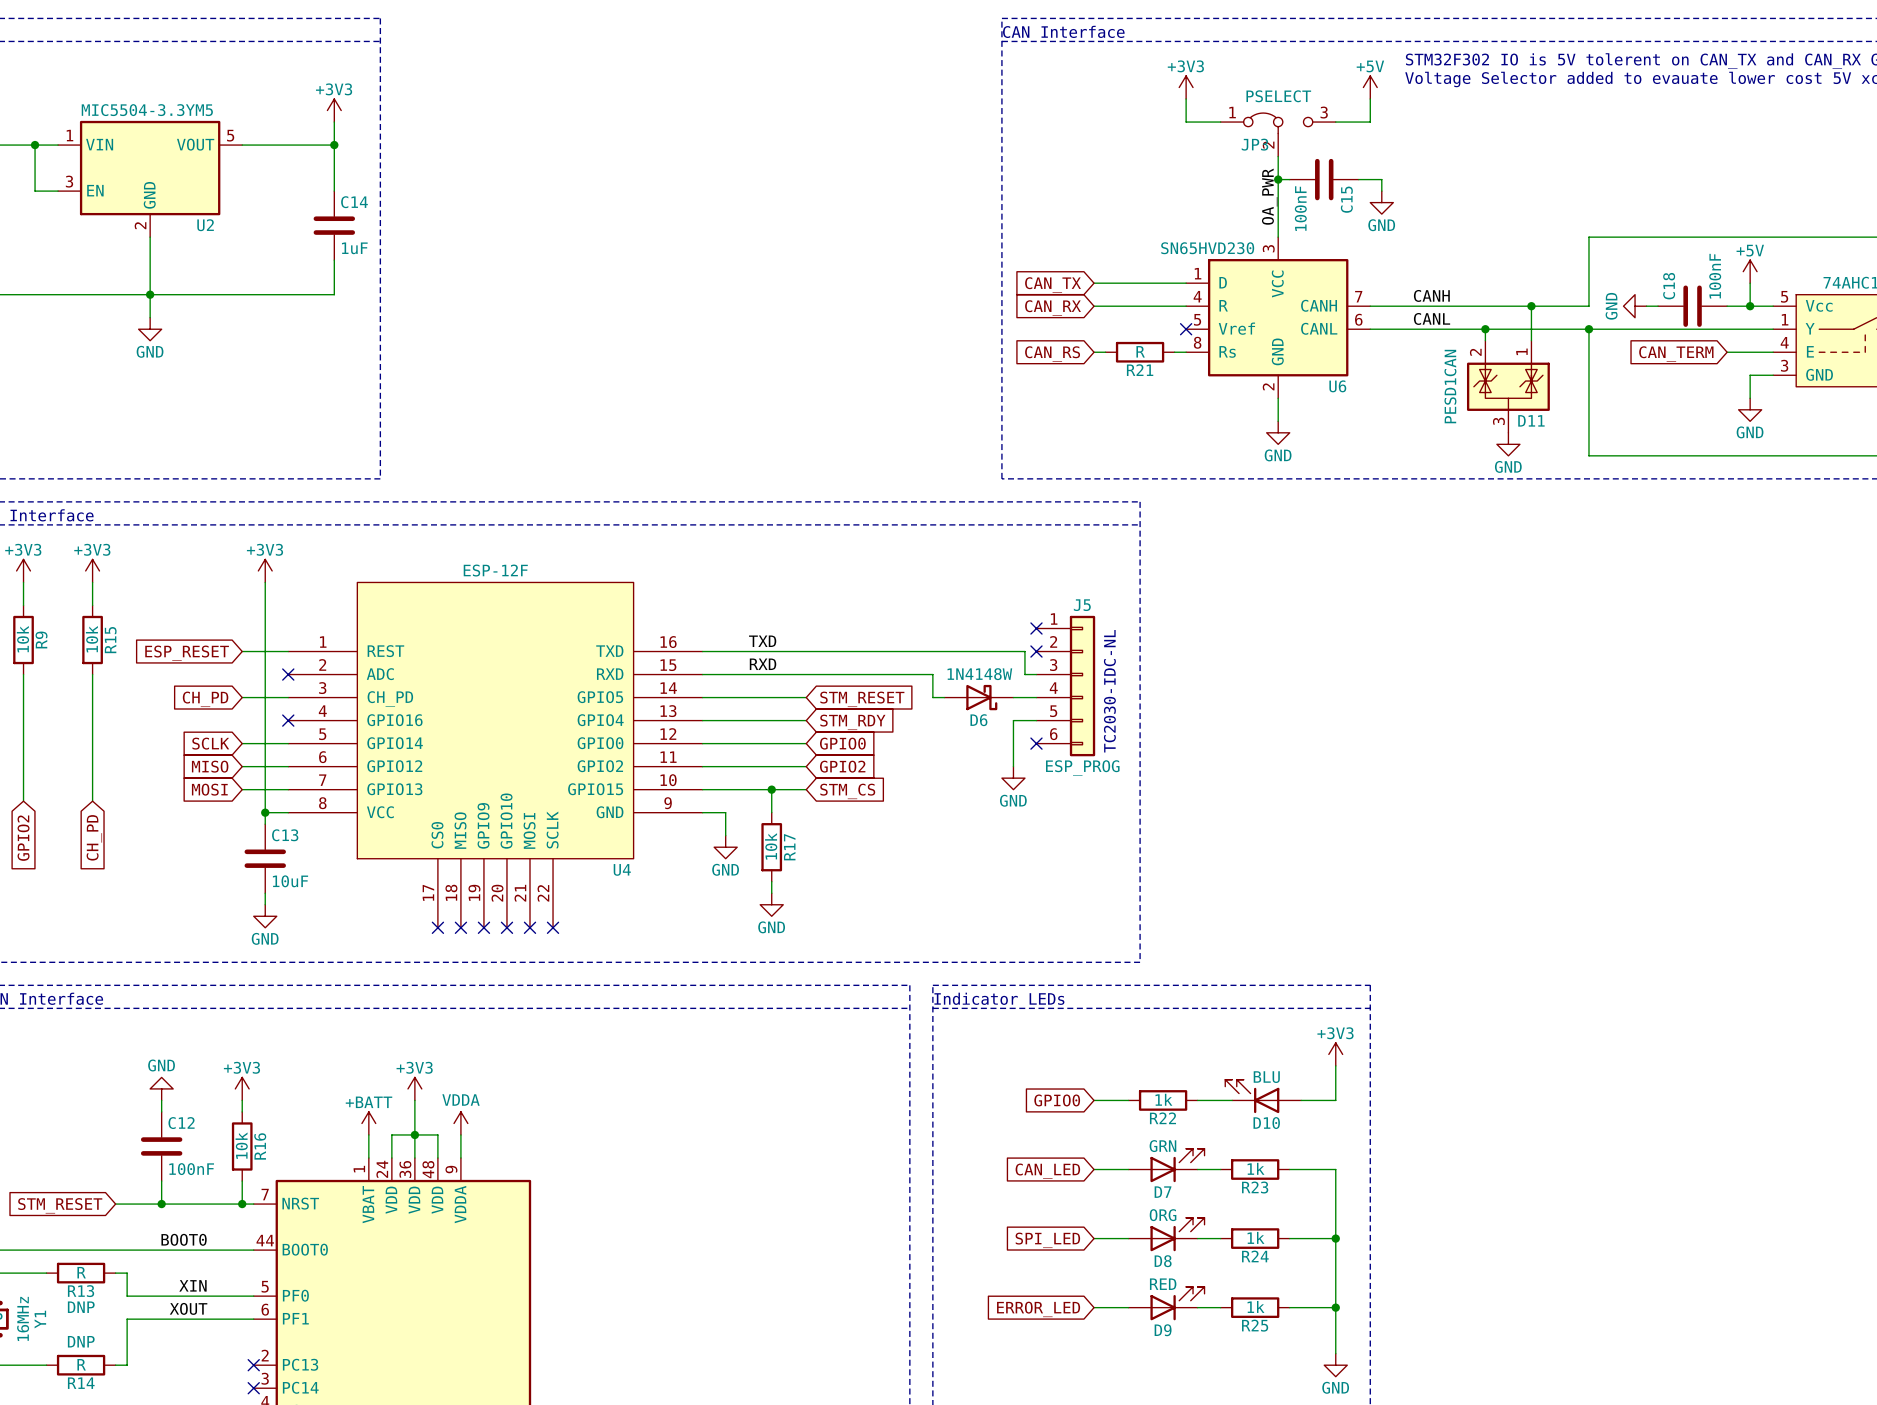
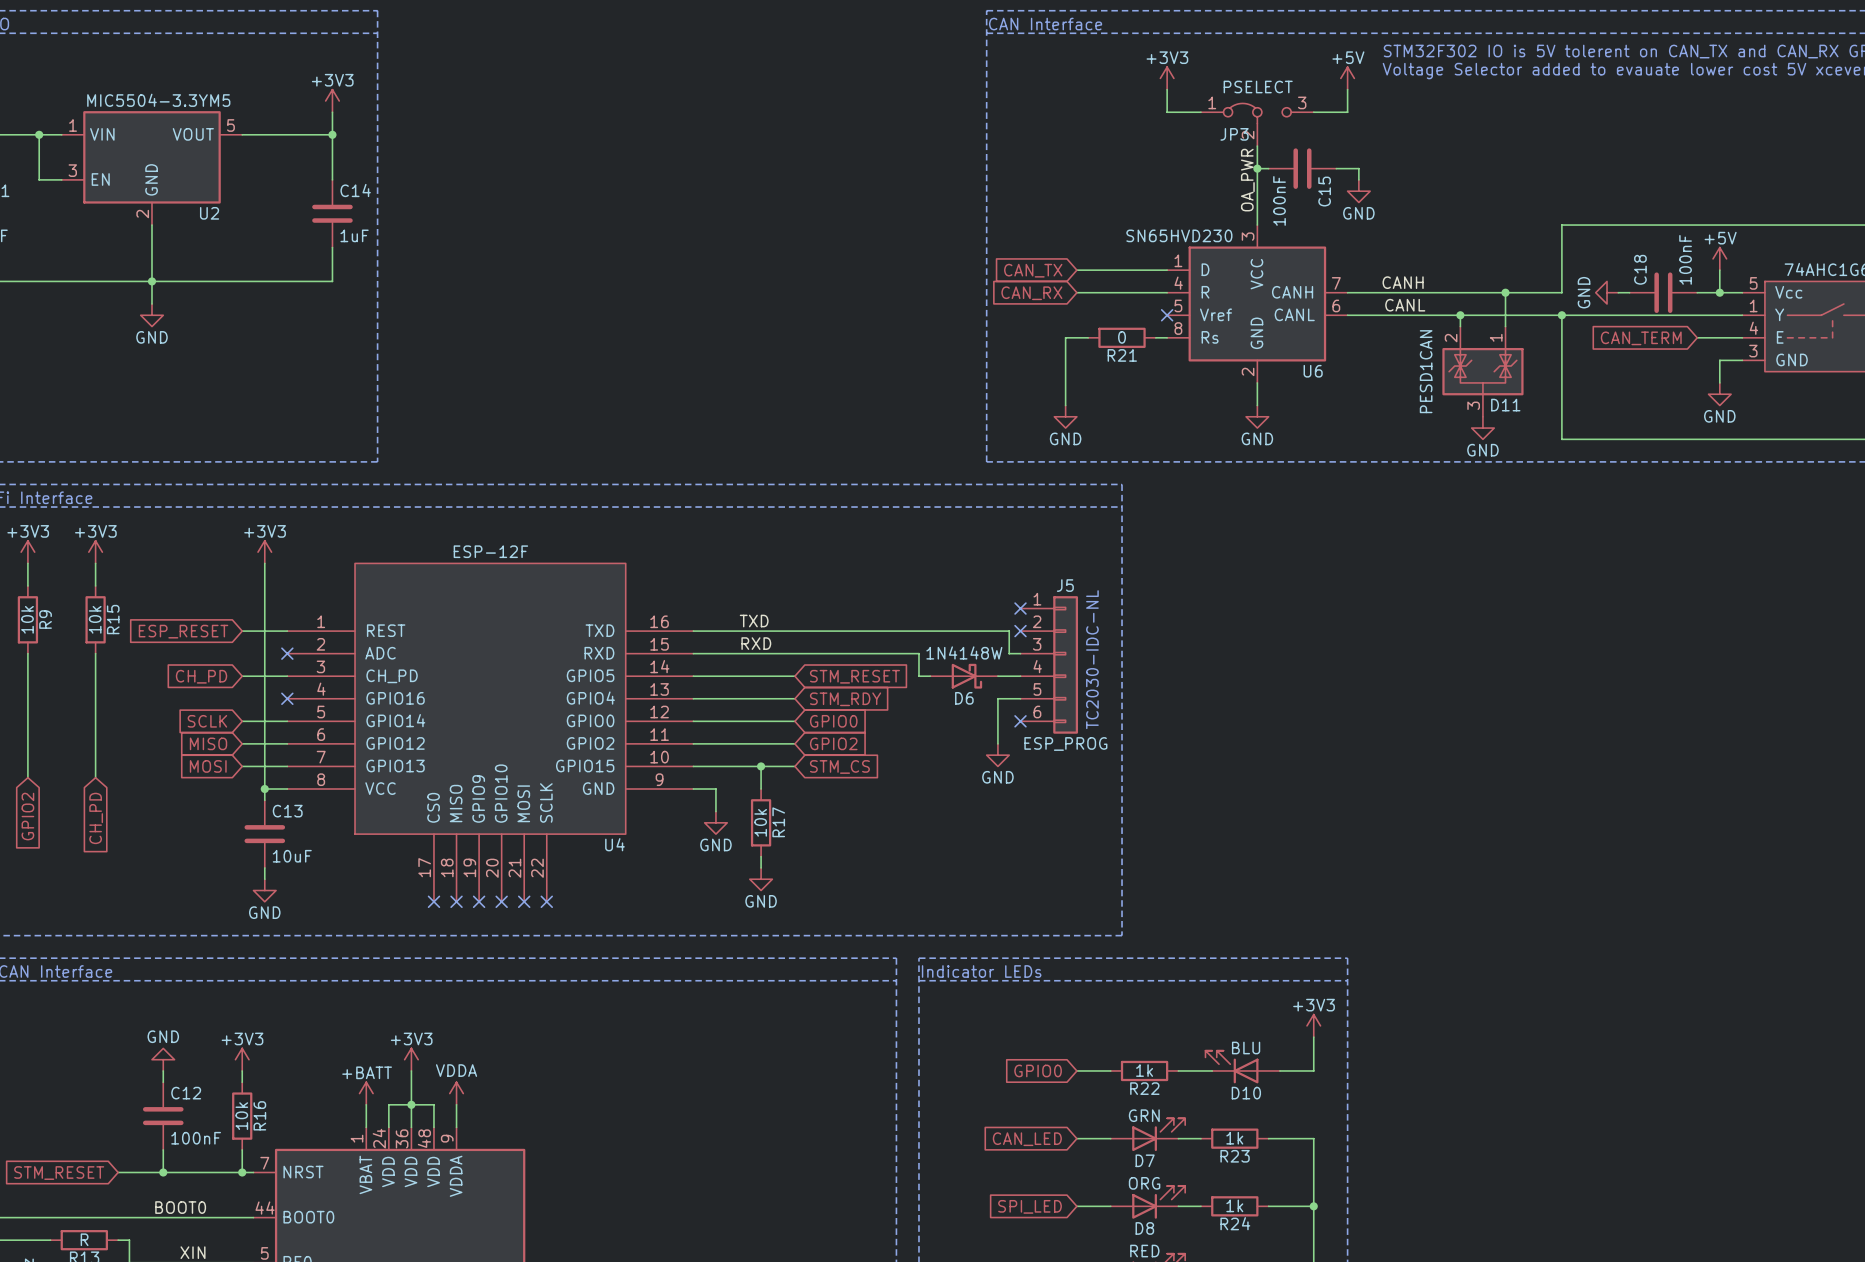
R21 value: R (1140, 351) -> 0 (1122, 337)
wire: none -> (1076, 337) (1065, 337) (1065, 405)
global label: CAN_RS (1052, 354) -> none
power symbol: none -> GND (1065, 416)

